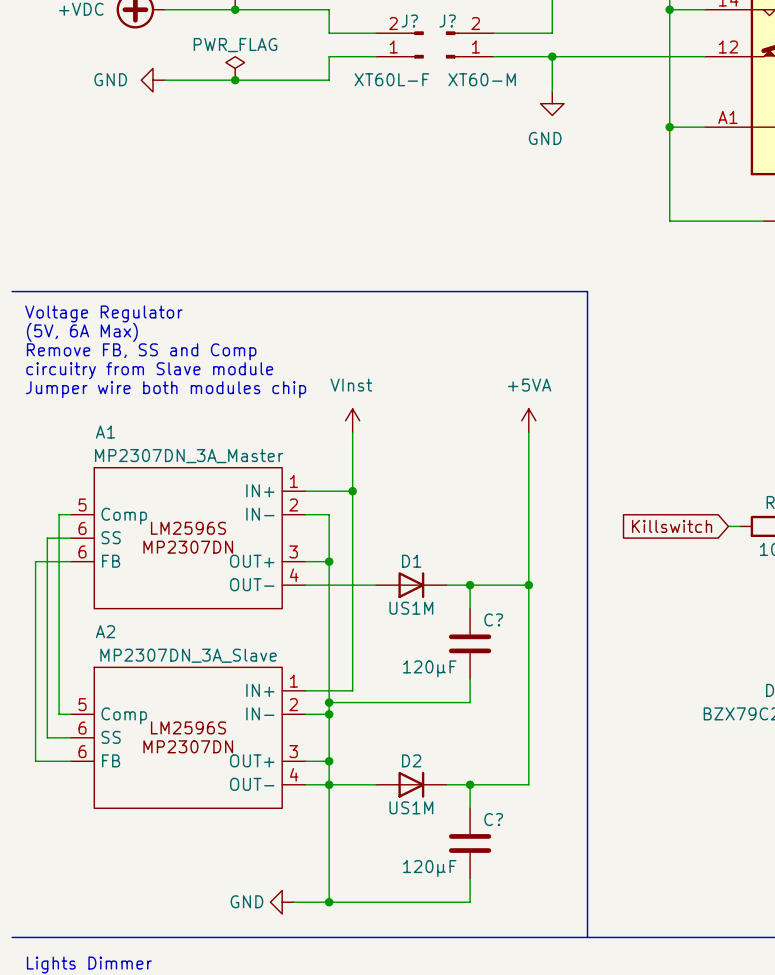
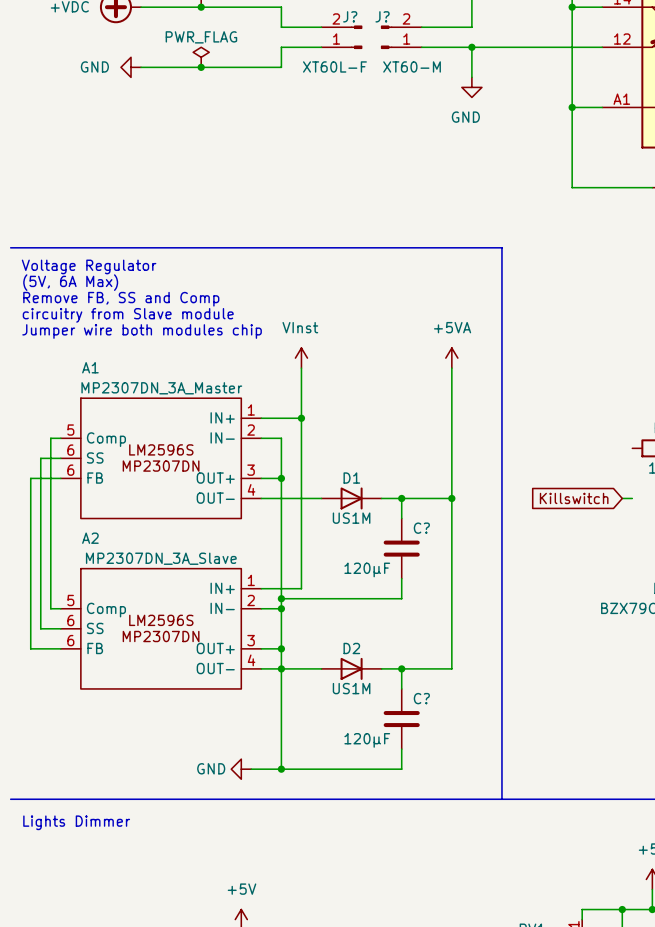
global label position: Killswitch (672, 526) -> Killswitch (574, 498)
wire: (728, 526) (740, 526) -> (622, 498) (632, 498)

